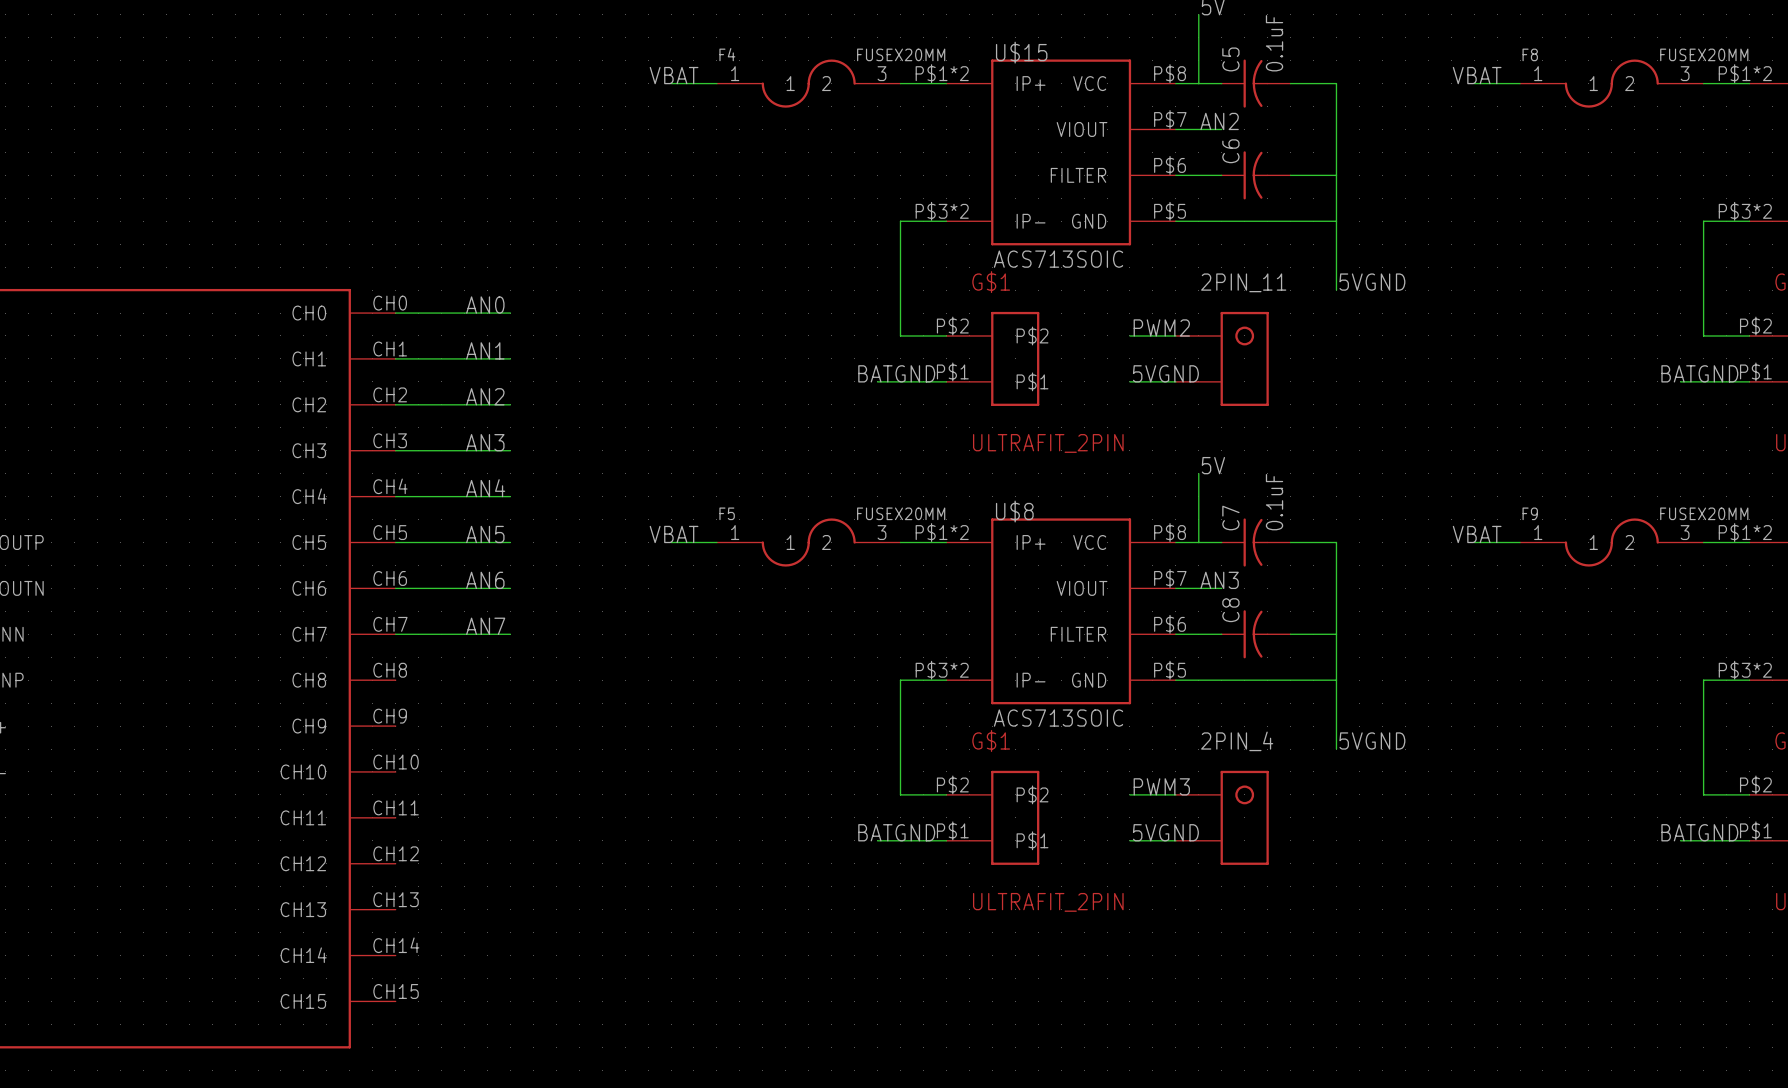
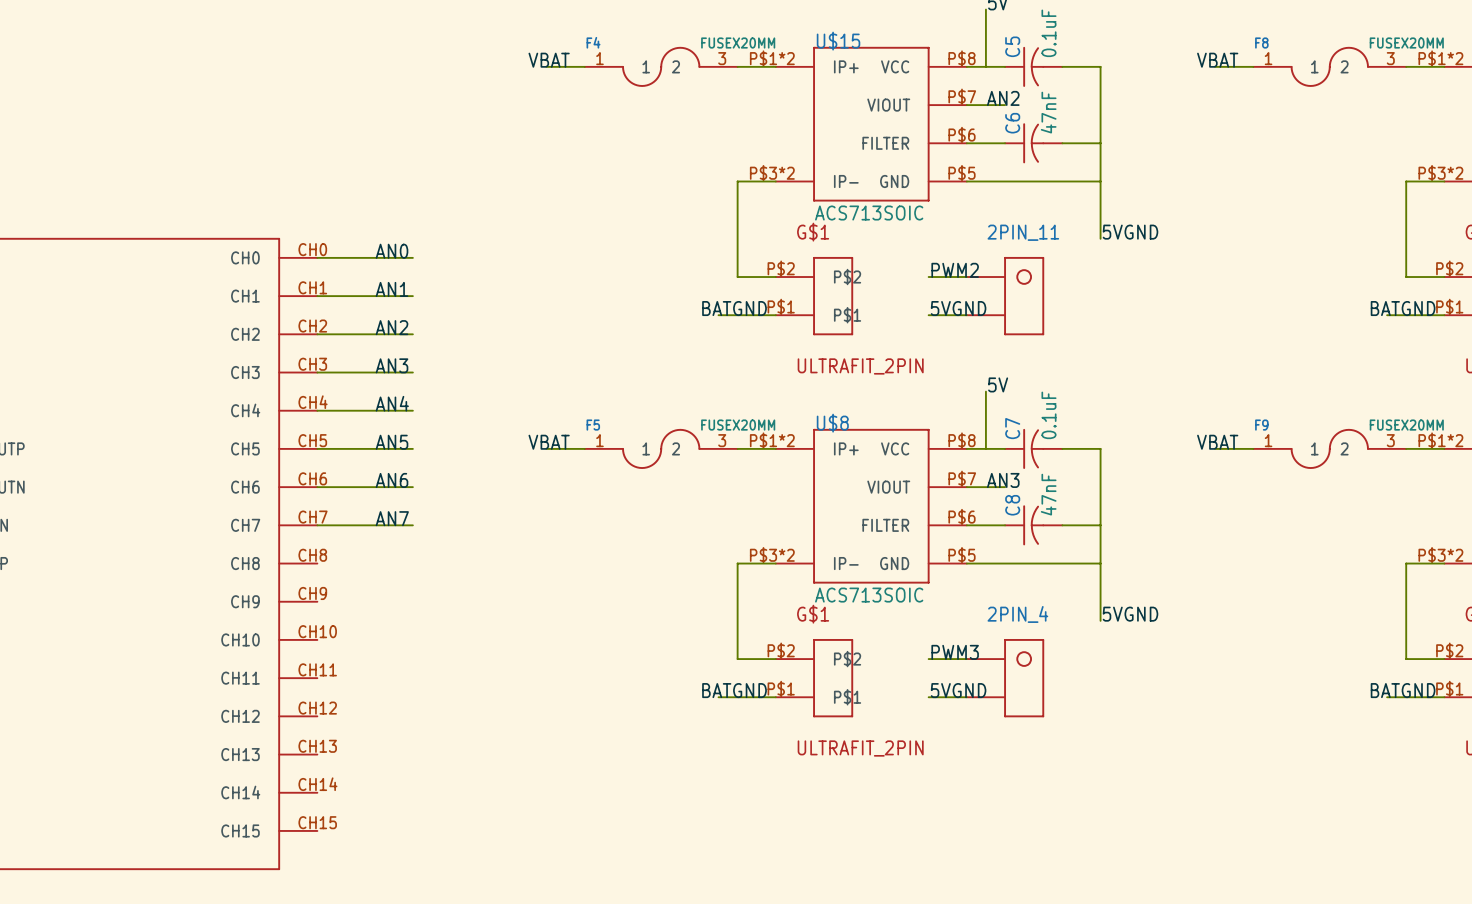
C6 value: none -> 47nF (1048, 112)
C8 value: none -> 47nF (1048, 494)

